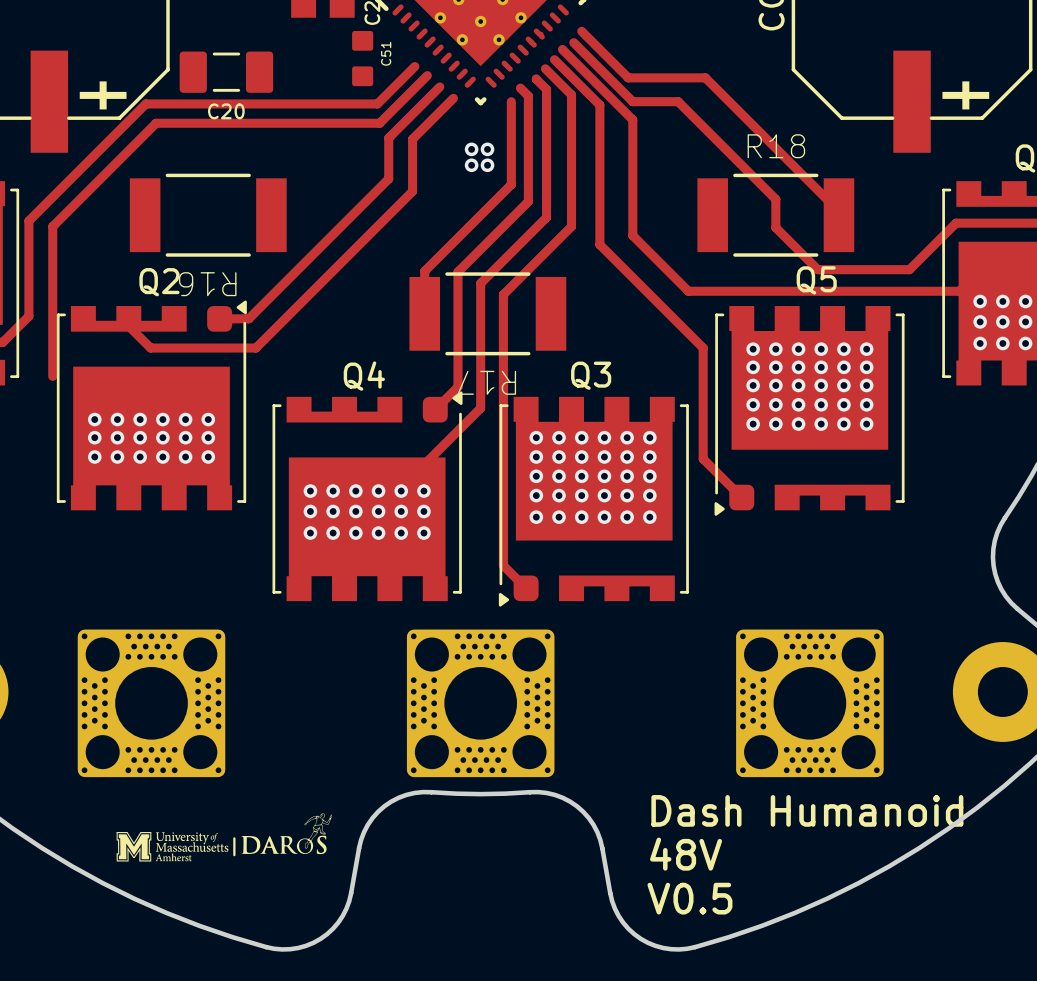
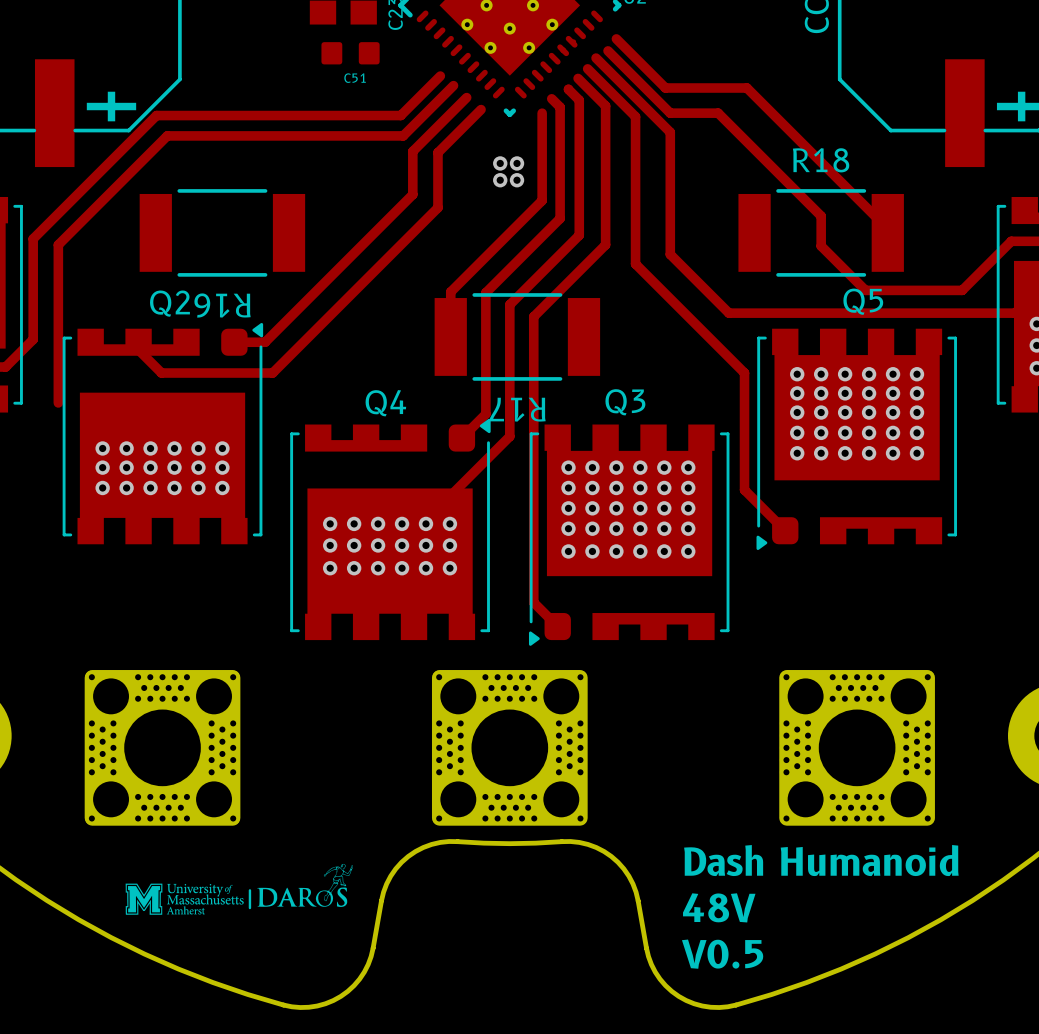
C51 rotation: 0° (362, 58) -> 90° clockwise (350, 53)
C51 position: (362, 58) -> (350, 53)
C20: (226, 72) -> none

